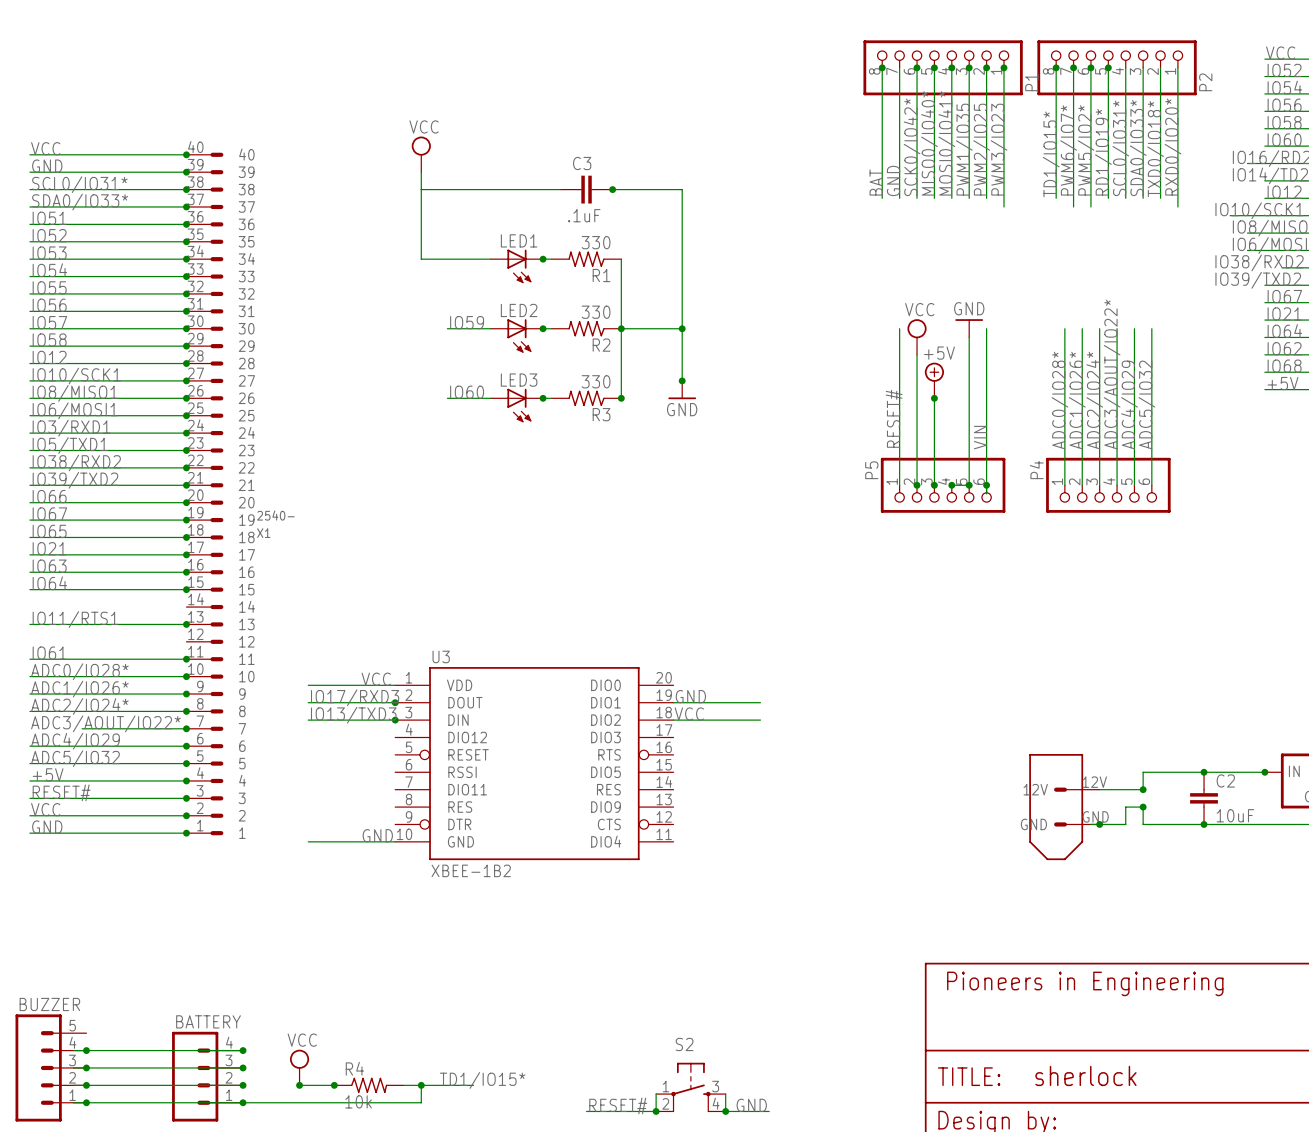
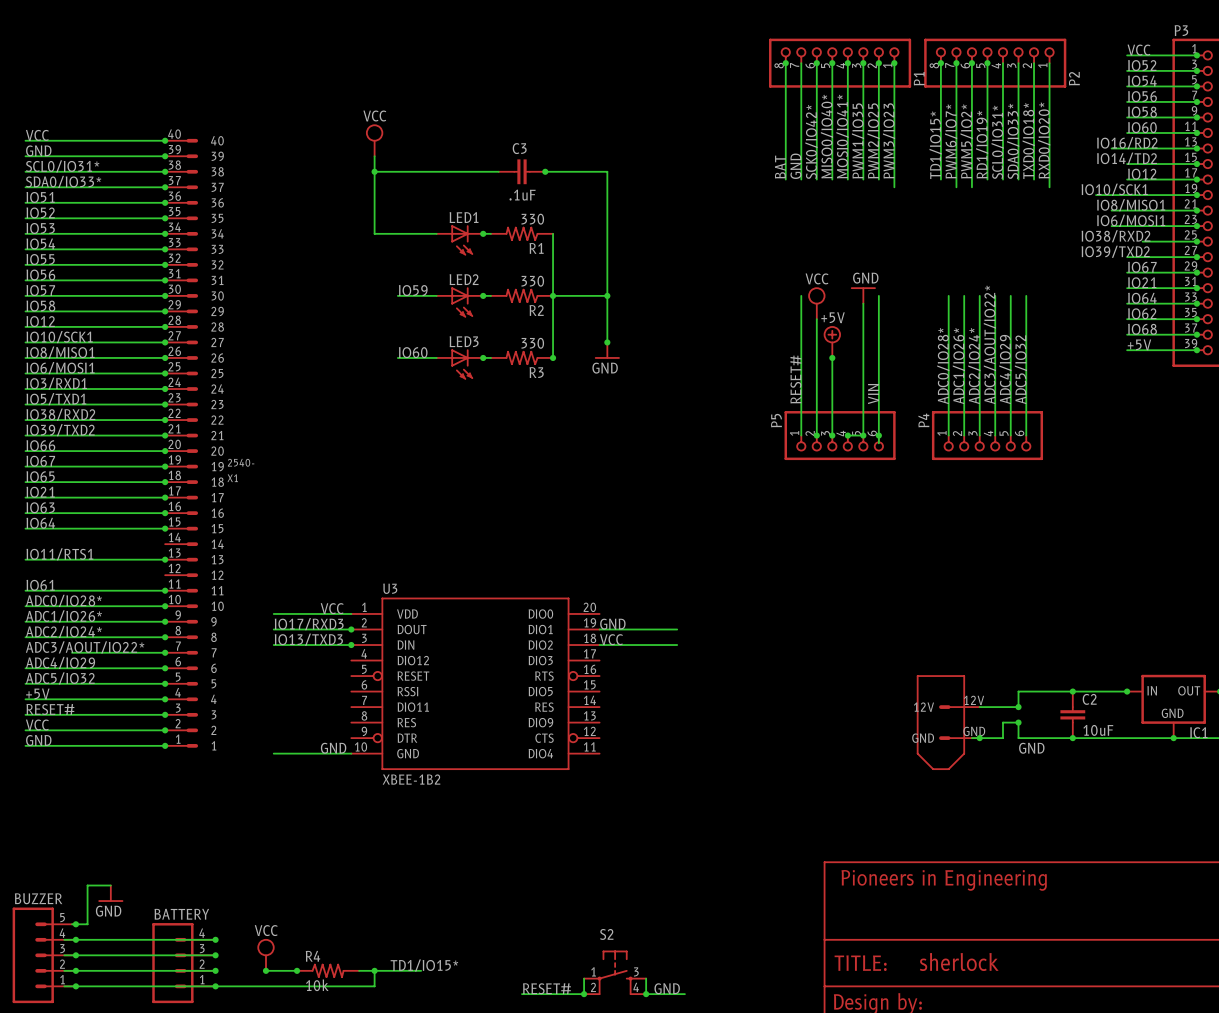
junction: none -> (374, 171)
label: none -> GND (1031, 748)
wire: none -> (110, 885) (87, 885) (87, 924) (72, 924)
power symbol: none -> GND (110, 893)
junction: none -> (75, 924)

